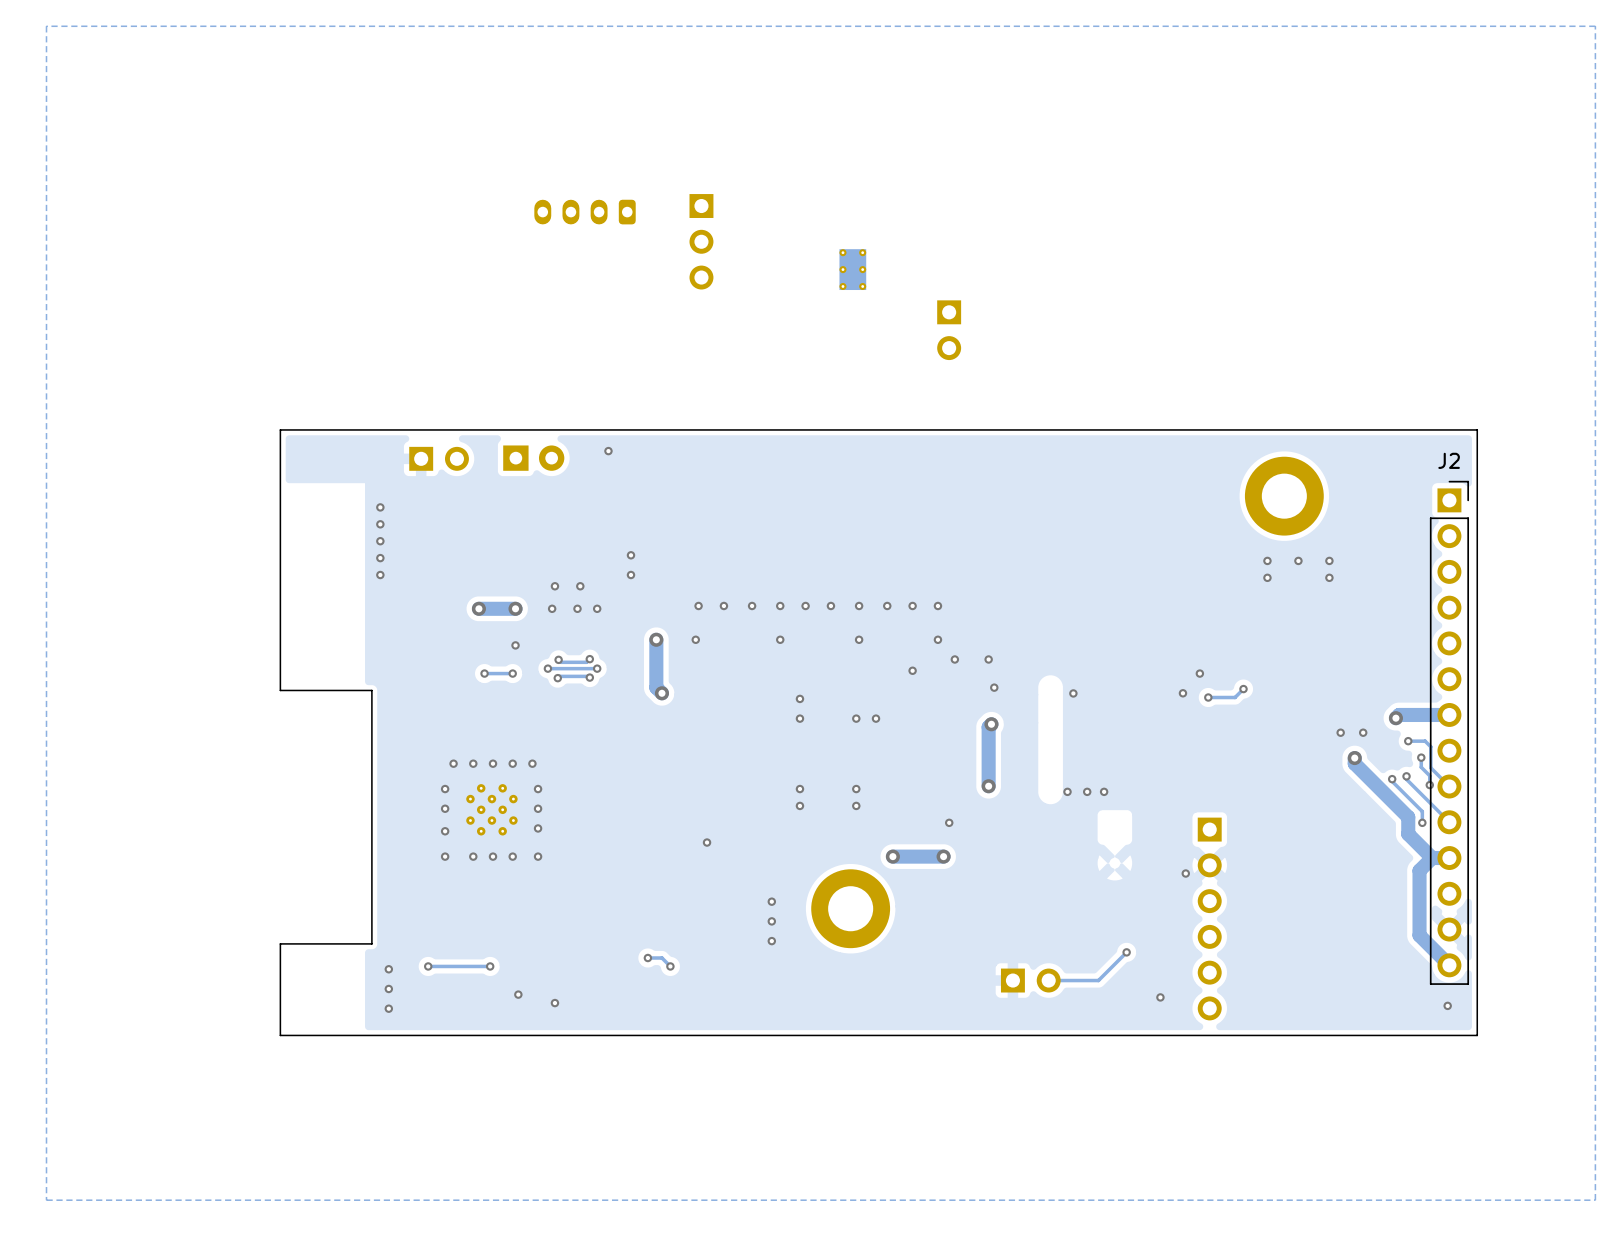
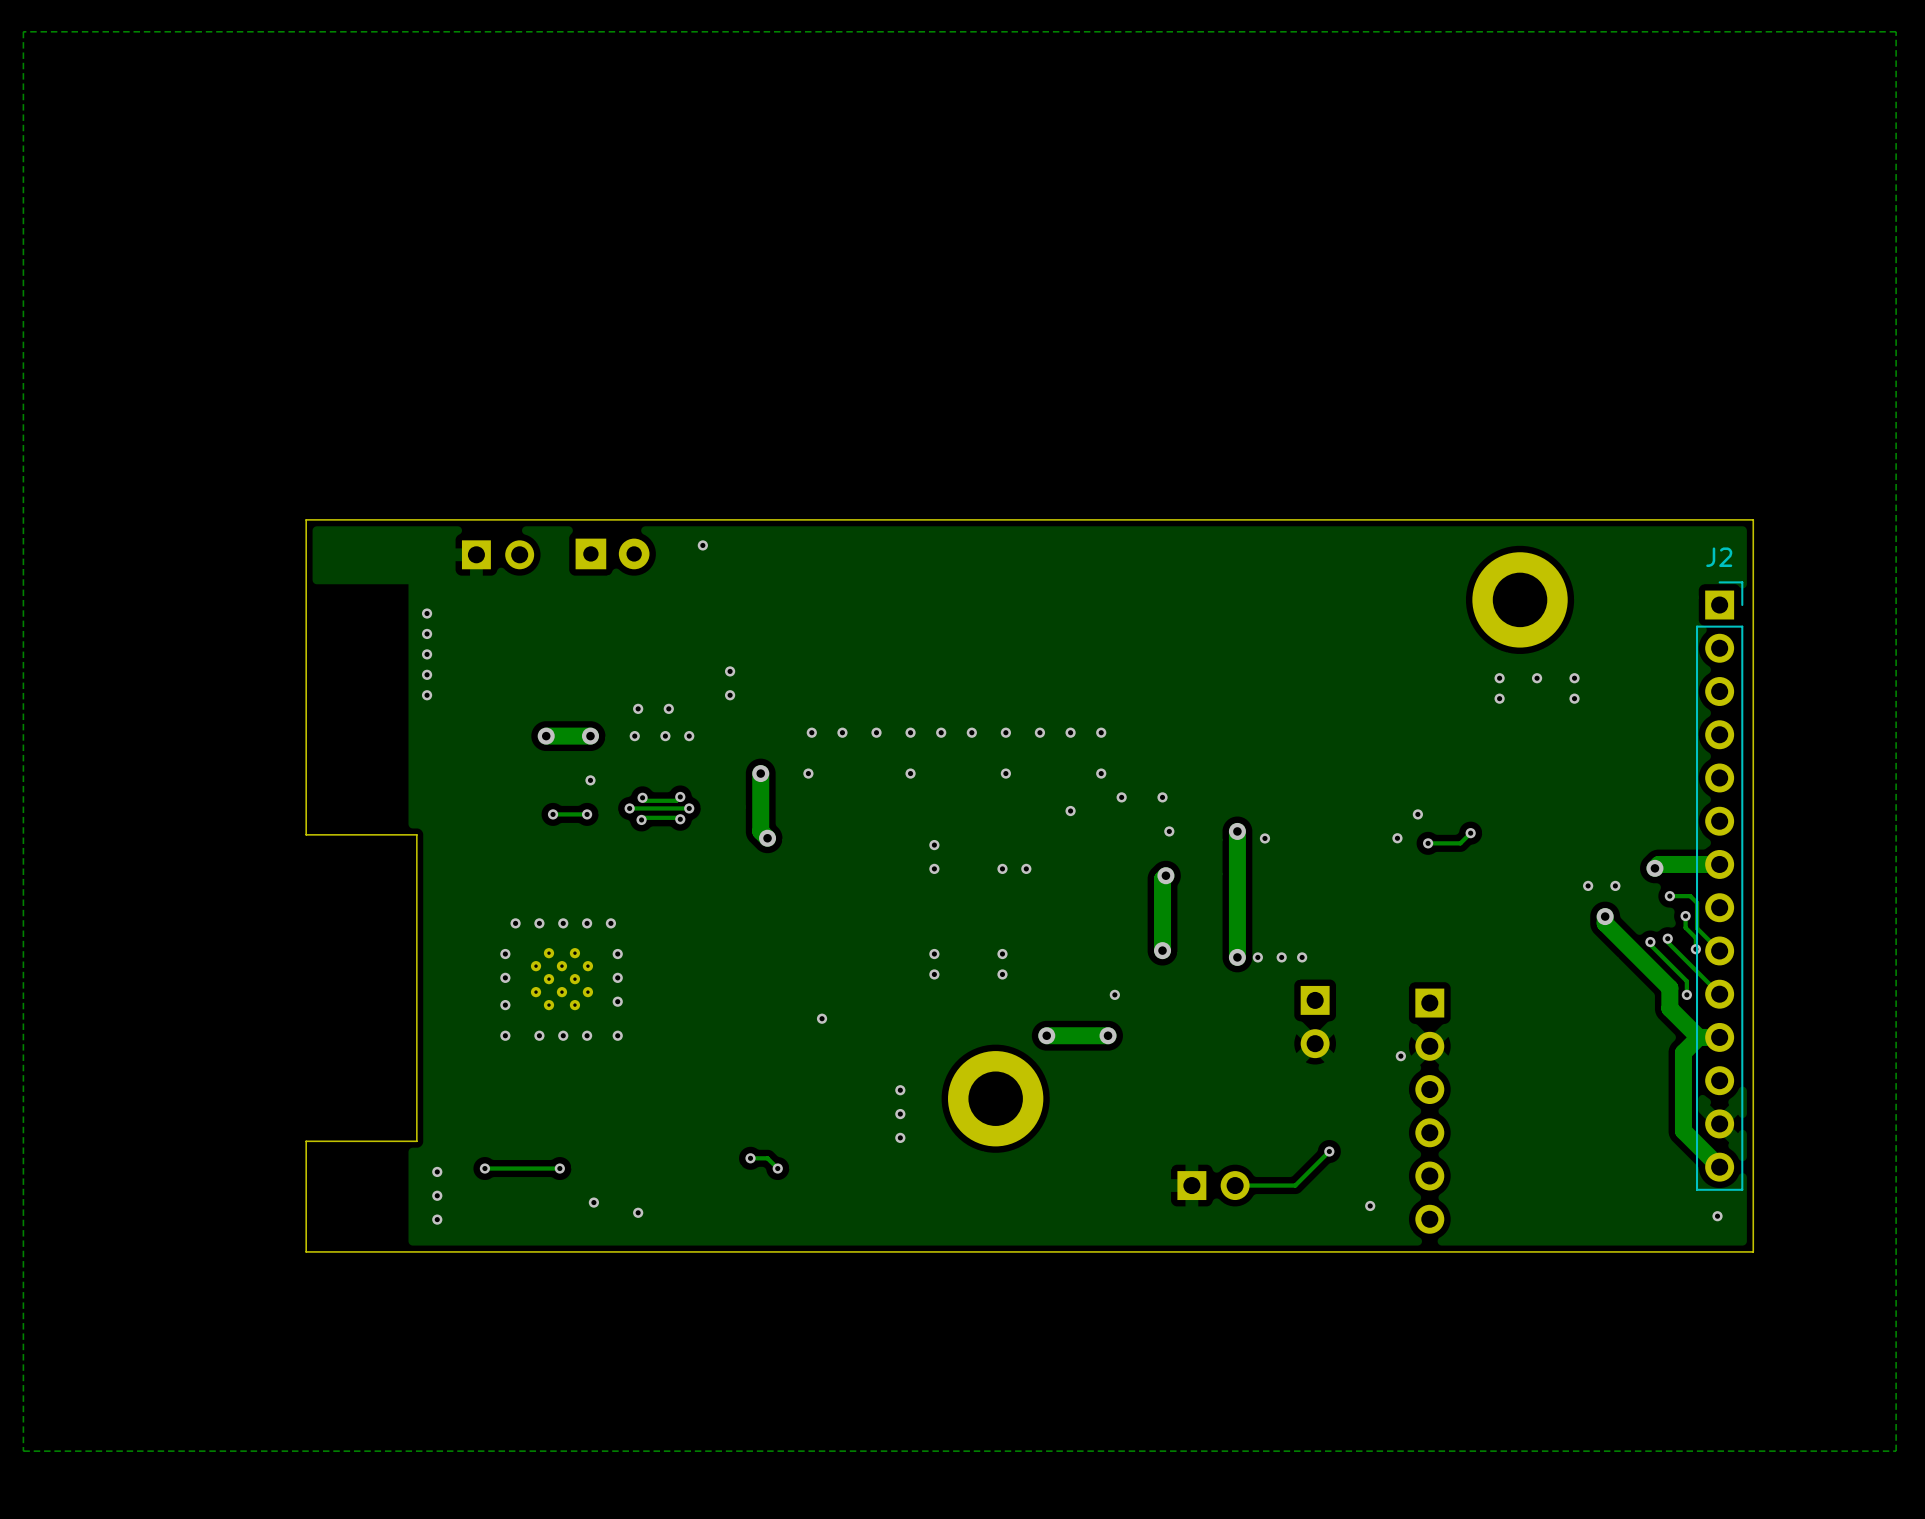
part: (585, 212) -> none
part: (701, 241) -> none
part: (852, 269) -> none
part: (949, 330) -> none
track: none -> (1237, 831) (1237, 957)
via: none -> (1237, 831)
via: none -> (1237, 957)
part: none -> (1315, 1022)

